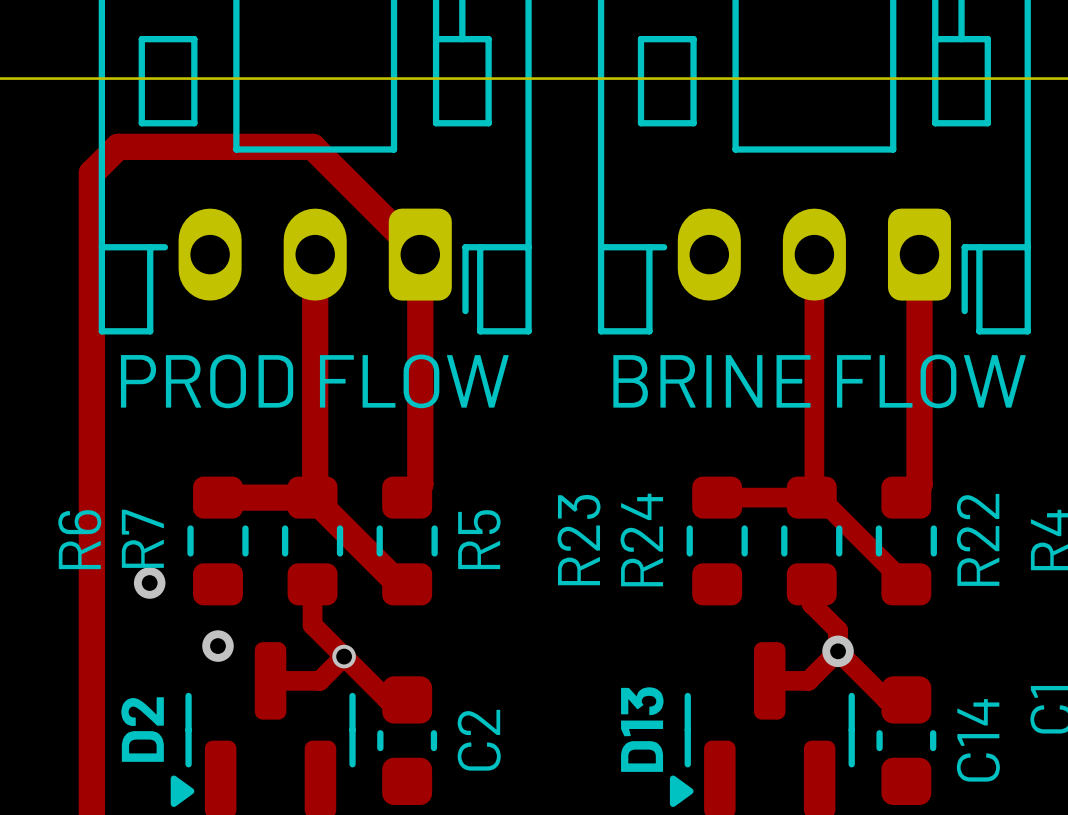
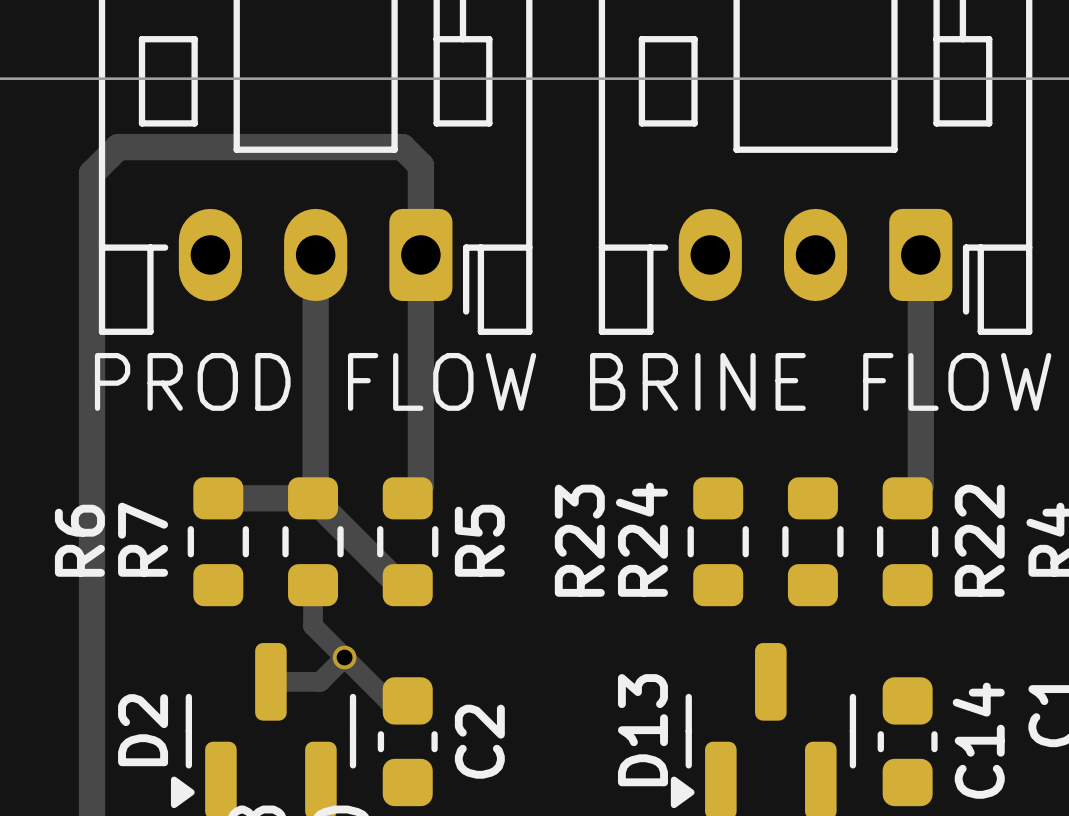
track: (312, 146) (420, 254) -> (313, 147) (402, 147) (420, 165) (420, 254)
track: (814, 254) (814, 494) (811, 497) -> none
track: (717, 497) (819, 497) (906, 584) -> none
via: (149, 583) -> none
track: (811, 584) (811, 604) (838, 630) (838, 651) -> none
via: (217, 646) -> none
track: (838, 651) (808, 680) (769, 680) -> none
track: (838, 651) (886, 699) (906, 699) -> none
via: (838, 651) -> none

